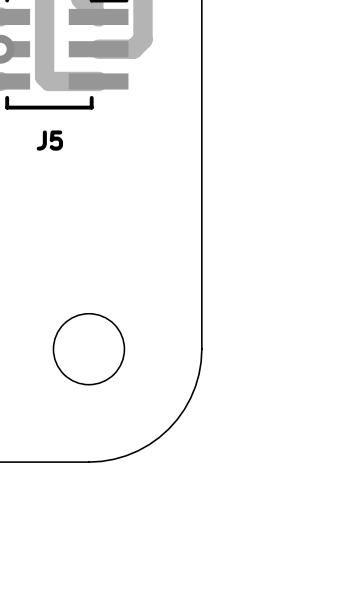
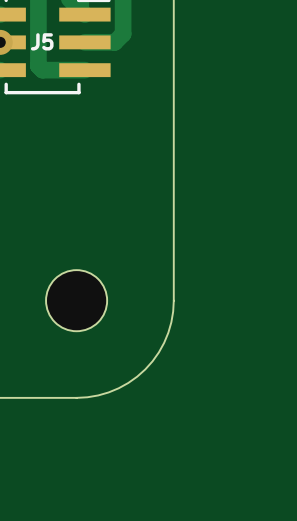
J5 name position: J5 (49, 140) -> J5 (42, 41)

